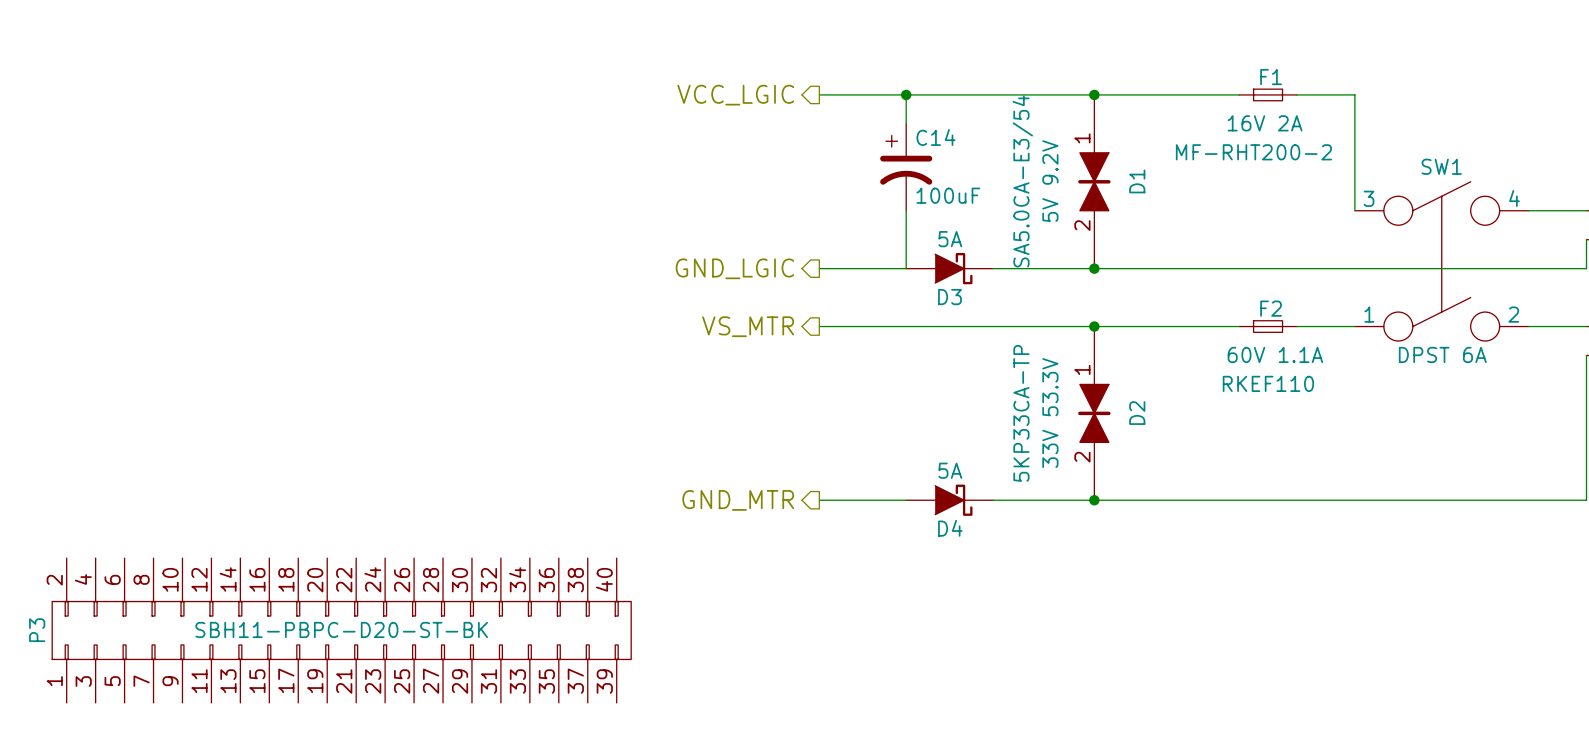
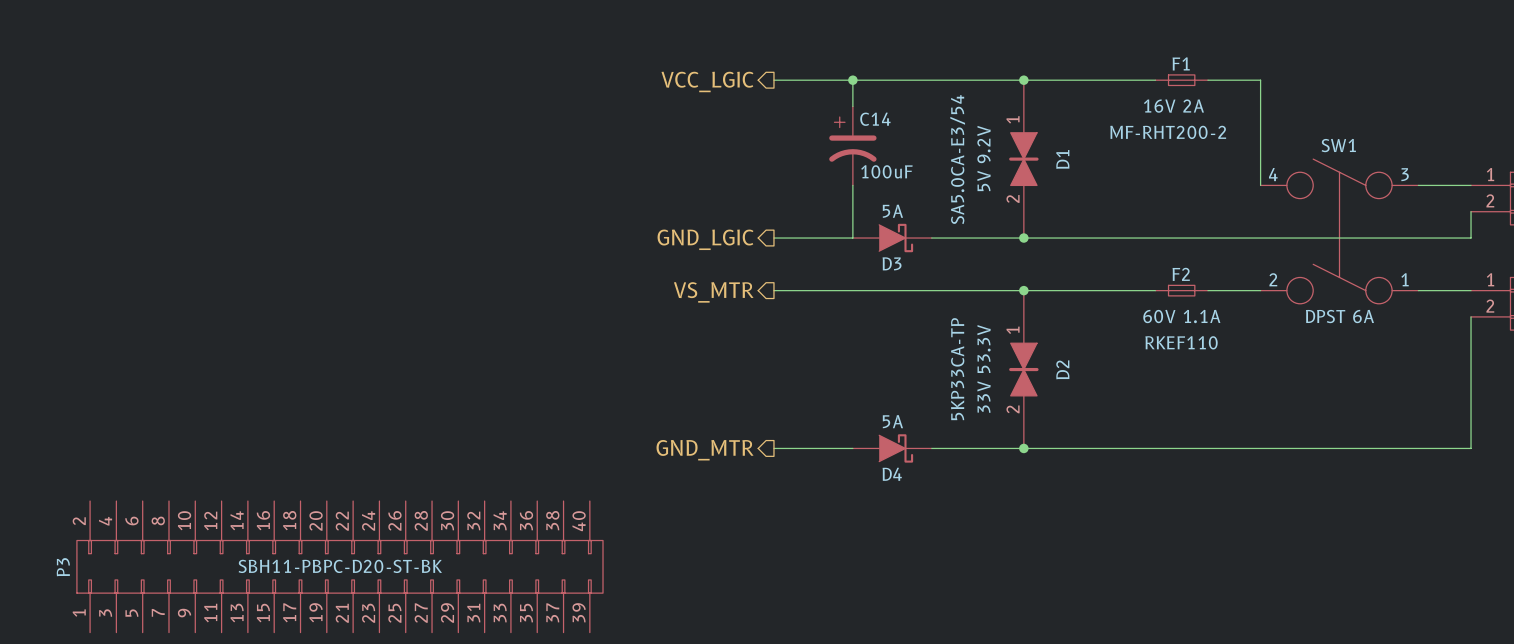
SW1 flip: as is (1441, 261) -> left-right (1339, 231)

